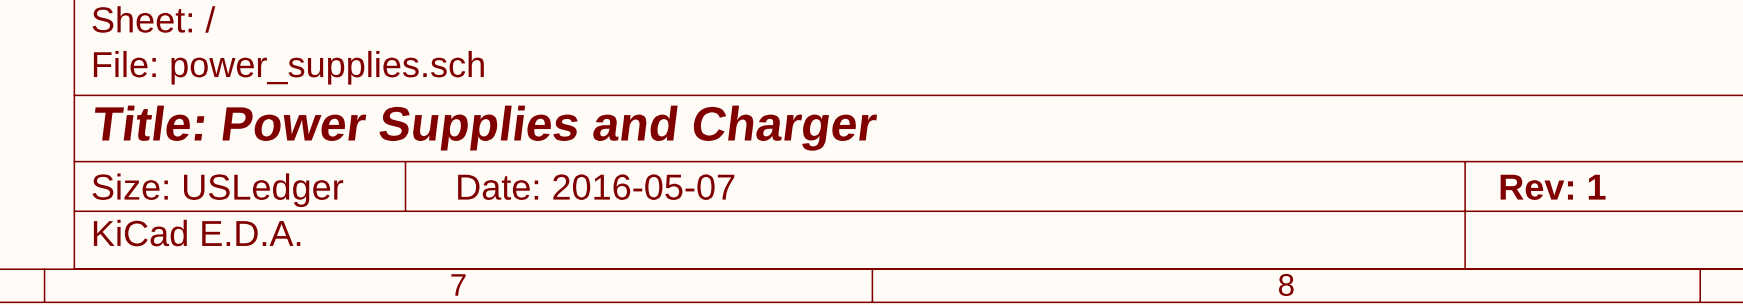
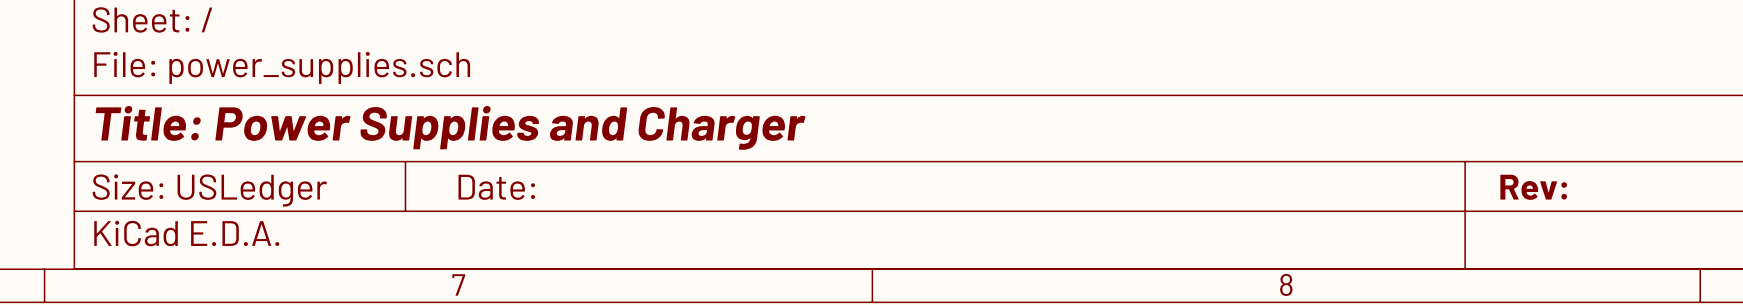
title block: Date: 2016-05-07 (596, 187) -> Date: (496, 187)
title block: Rev: 1 (1553, 187) -> Rev: (1533, 187)

